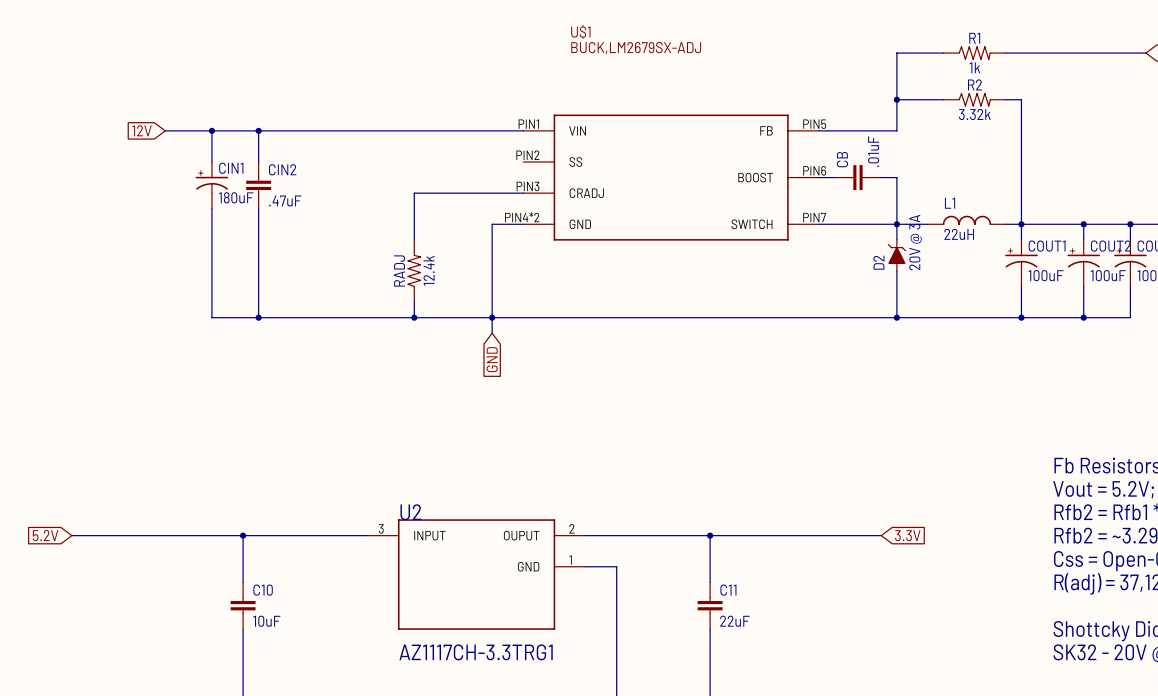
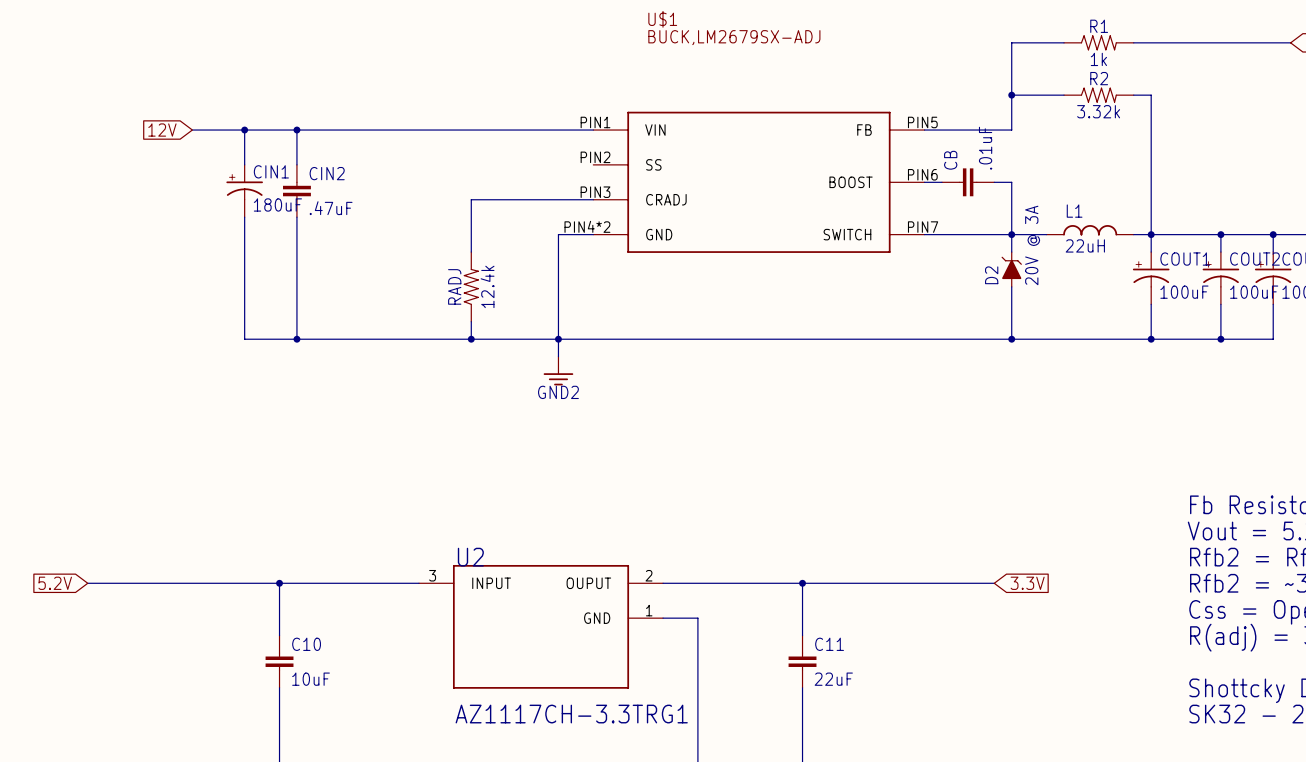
power symbol: none -> GND2 (558, 371)
global label: GND (492, 359) -> none

